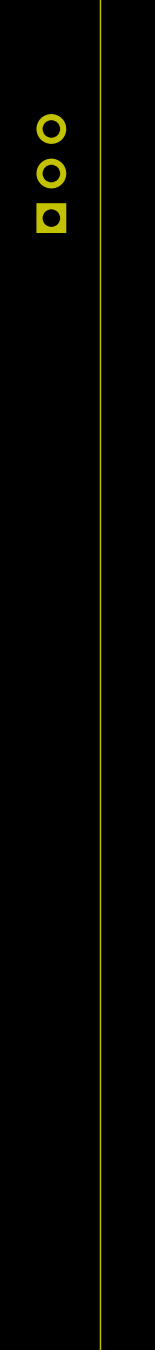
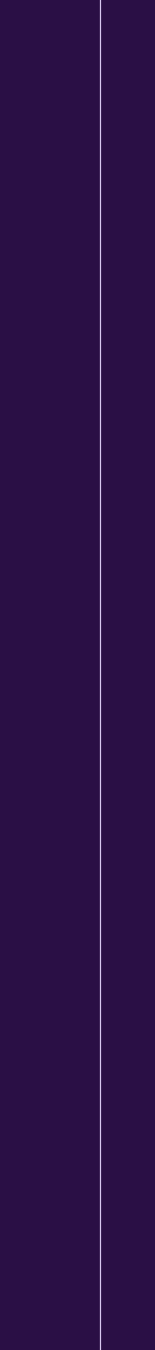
part: (51, 173) -> none

